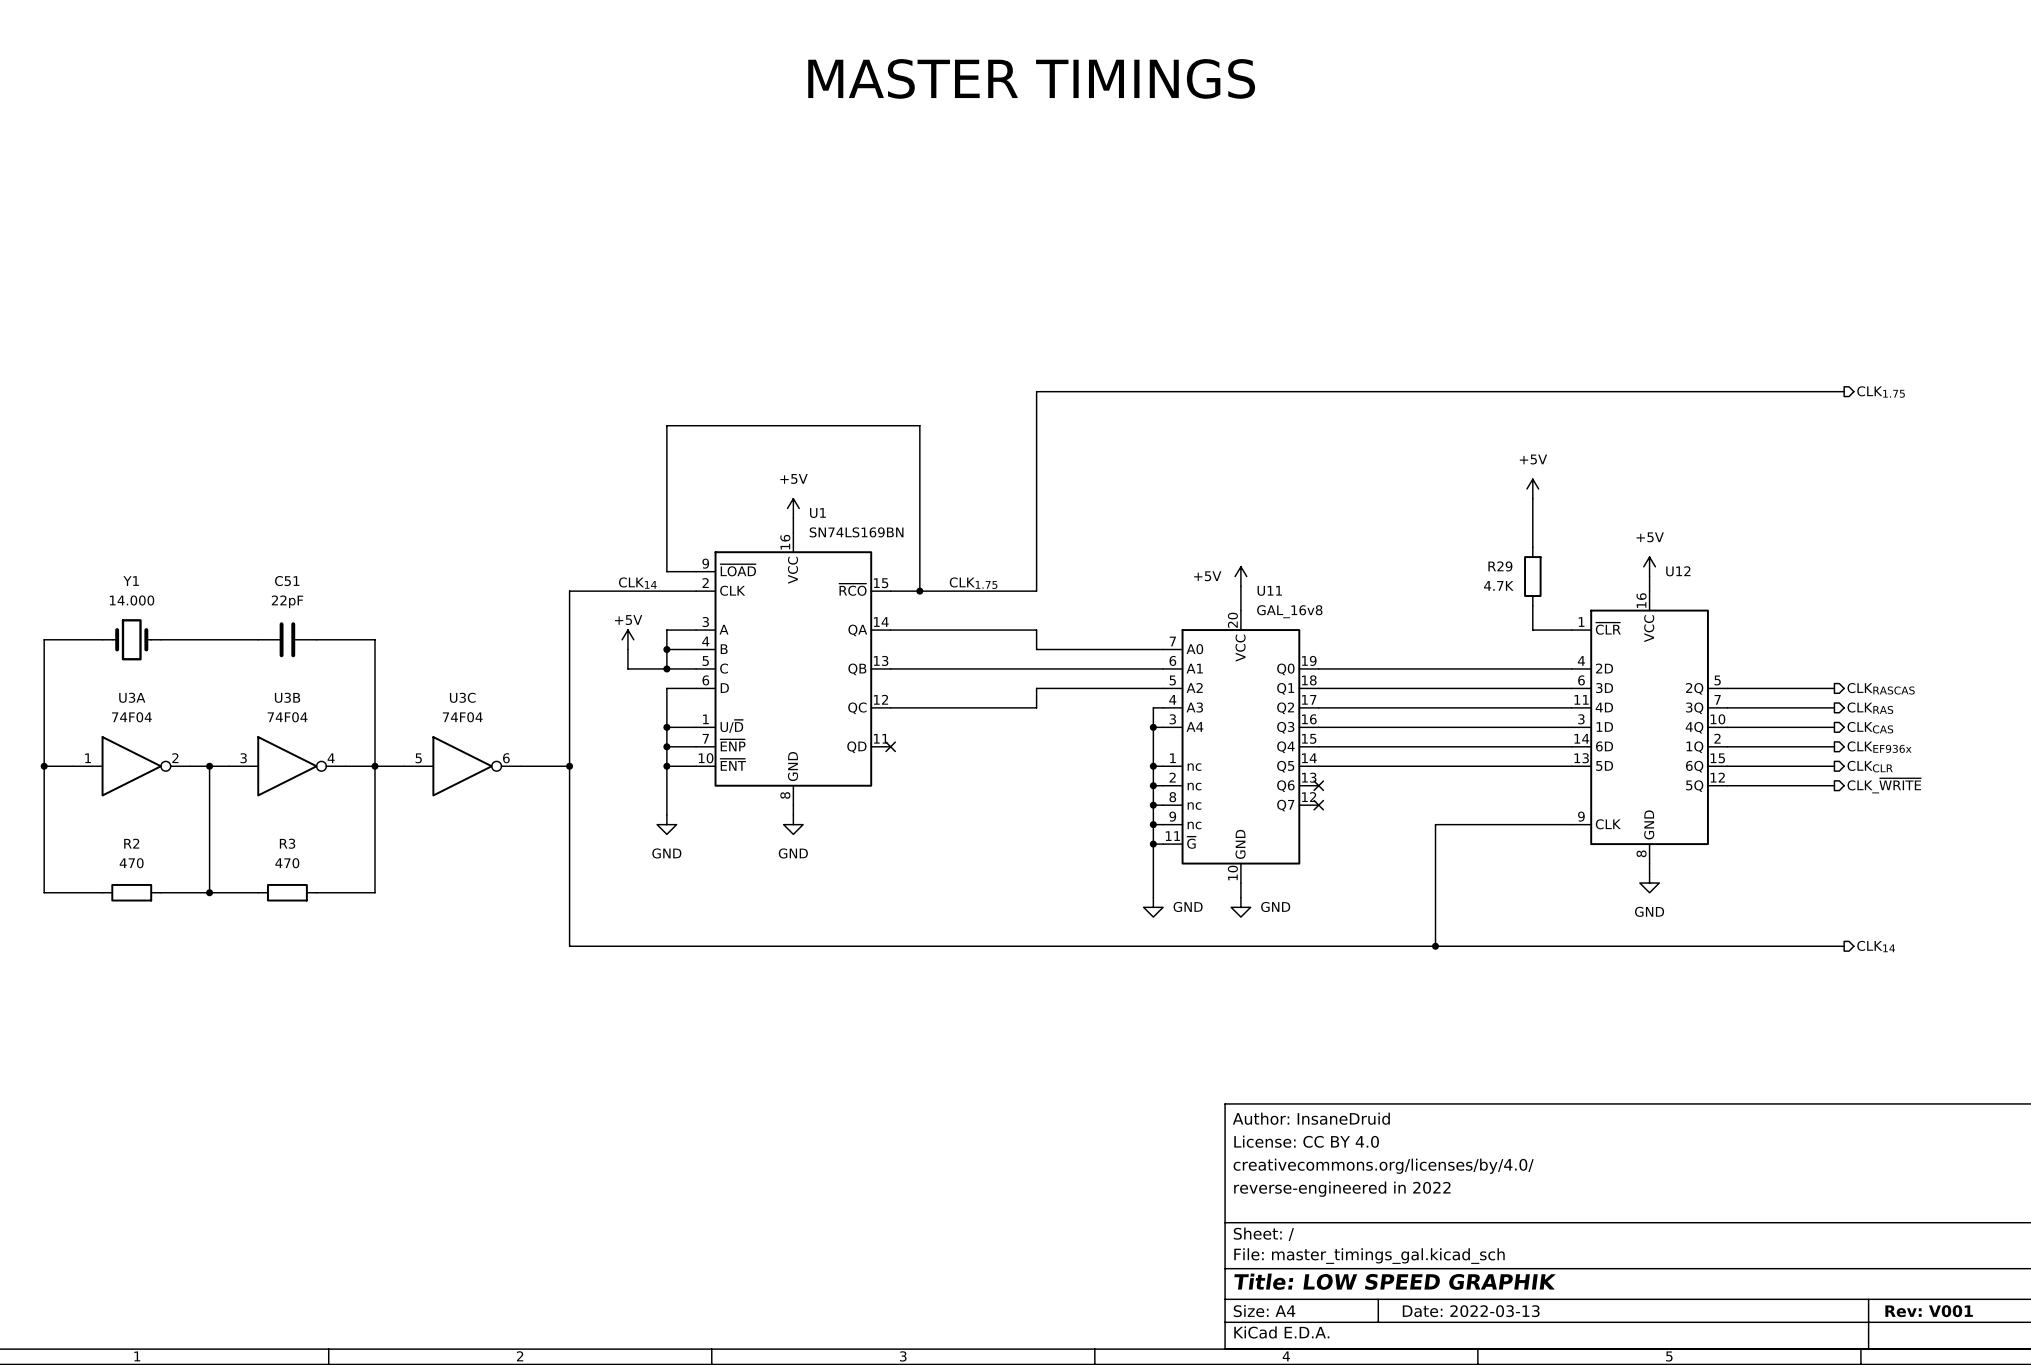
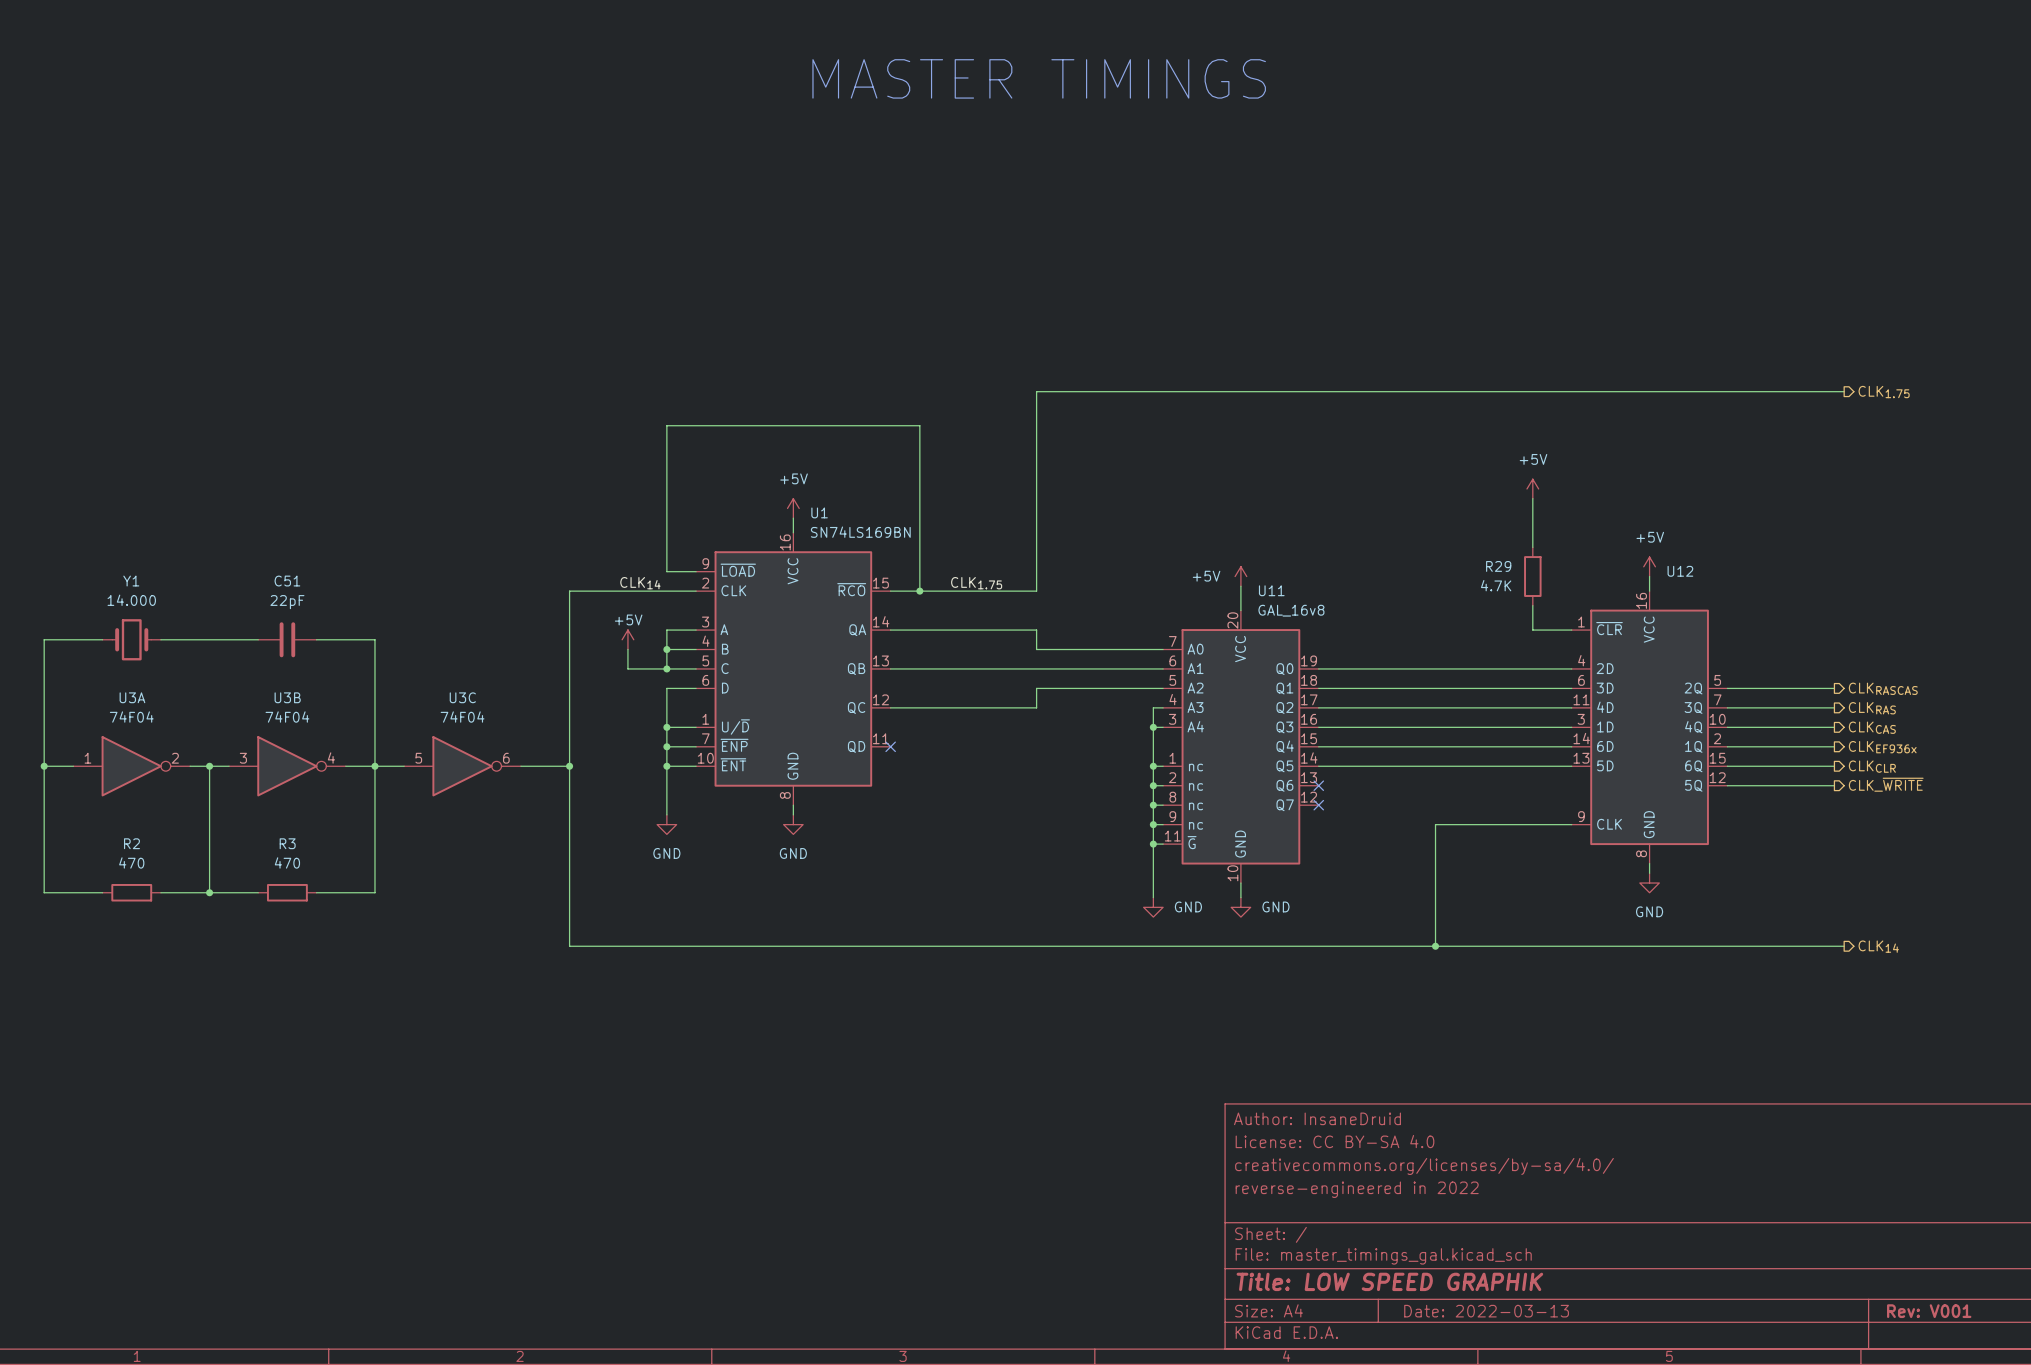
title block: License: CC BY 4.0 (1306, 1141) -> License: CC BY-SA 4.0 (1335, 1141)
title block: creativecommons.org/licenses/by/4.0/ (1383, 1166) -> creativecommons.org/licenses/by-sa/4.0/ (1424, 1166)

